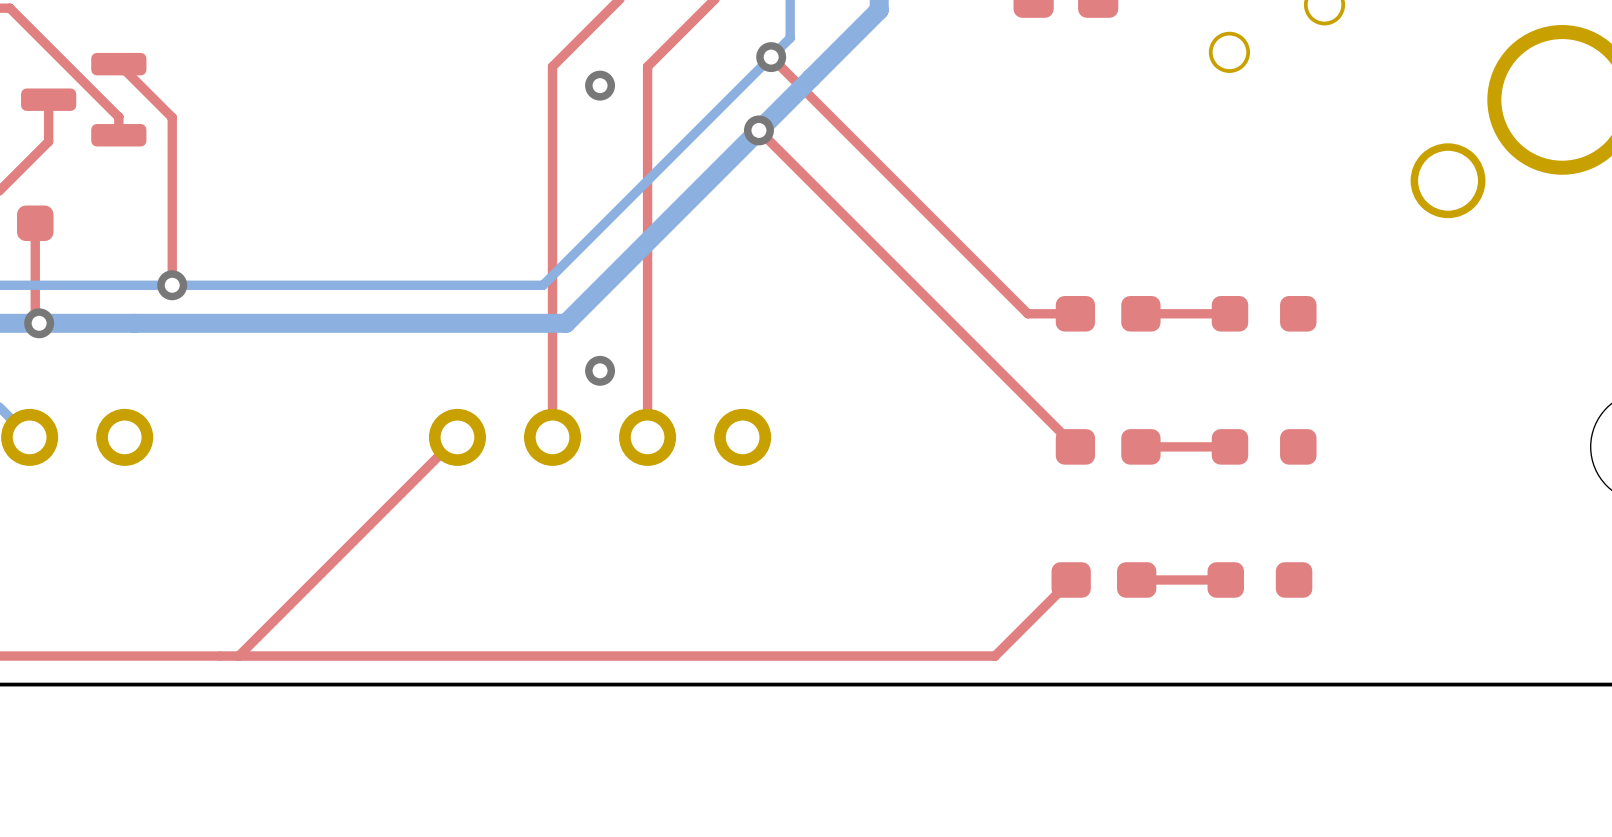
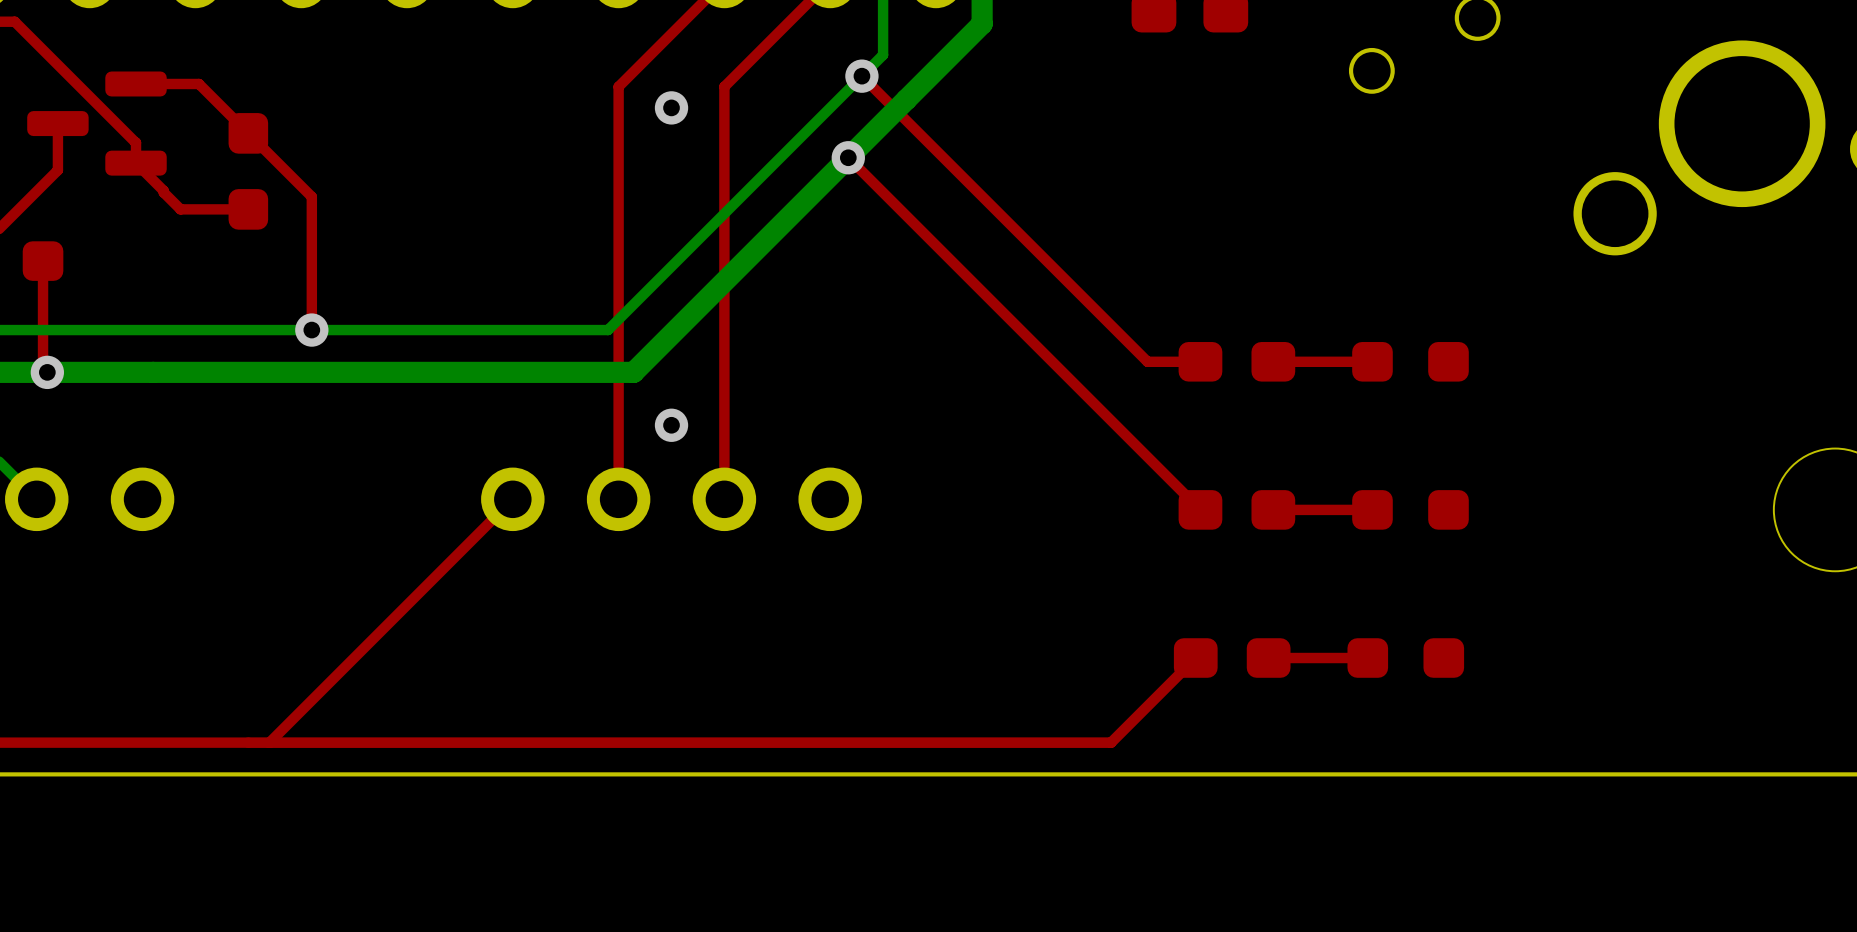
top track: (118, 64) (172, 117) (172, 285) -> (136, 83) (198, 83) (311, 196) (311, 330)
top track: none -> (136, 163) (180, 209) (248, 209)
part: none -> (248, 171)
via position: (172, 285) -> (311, 330)

